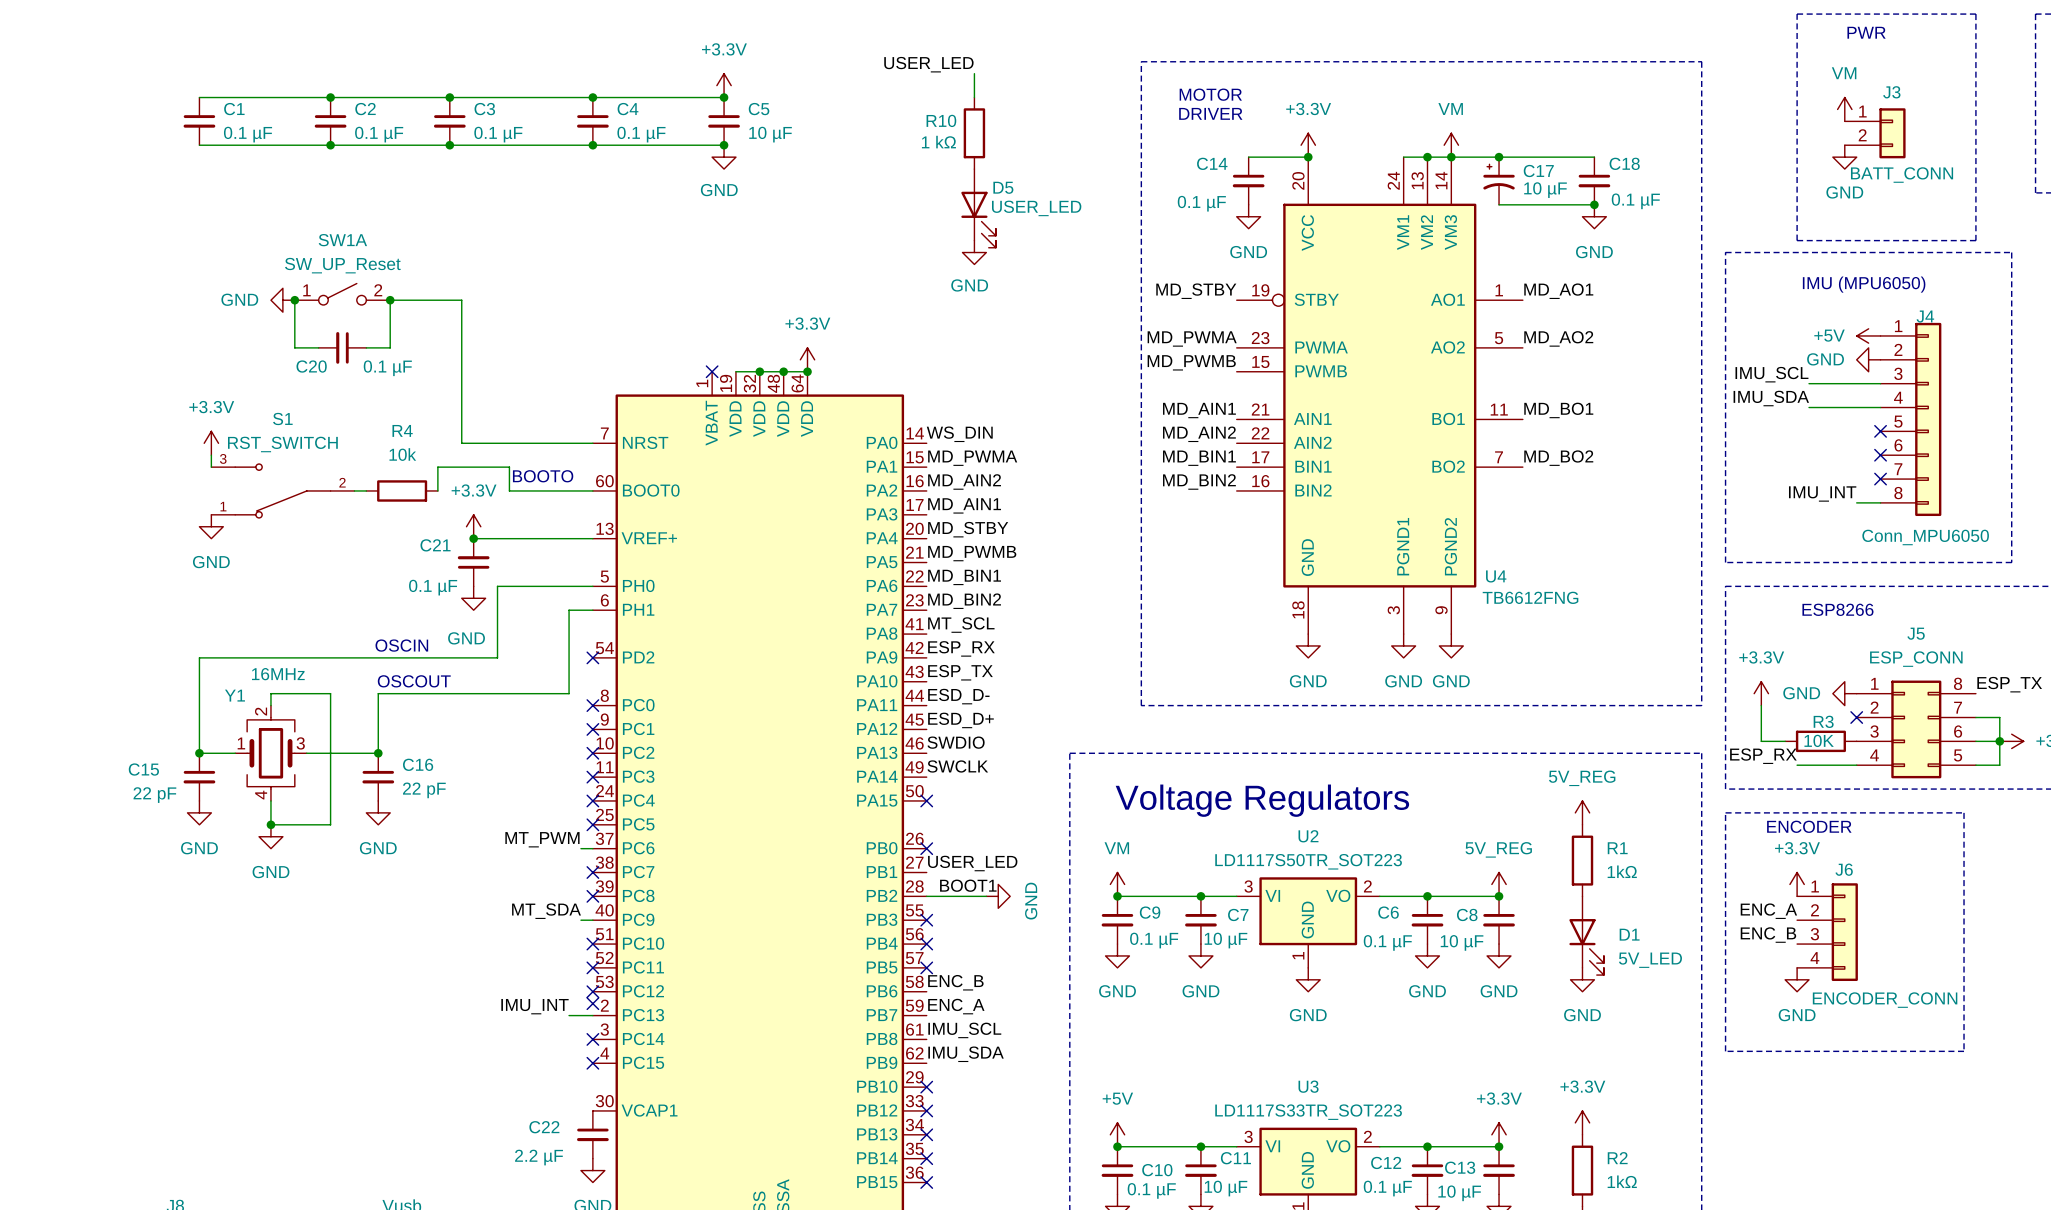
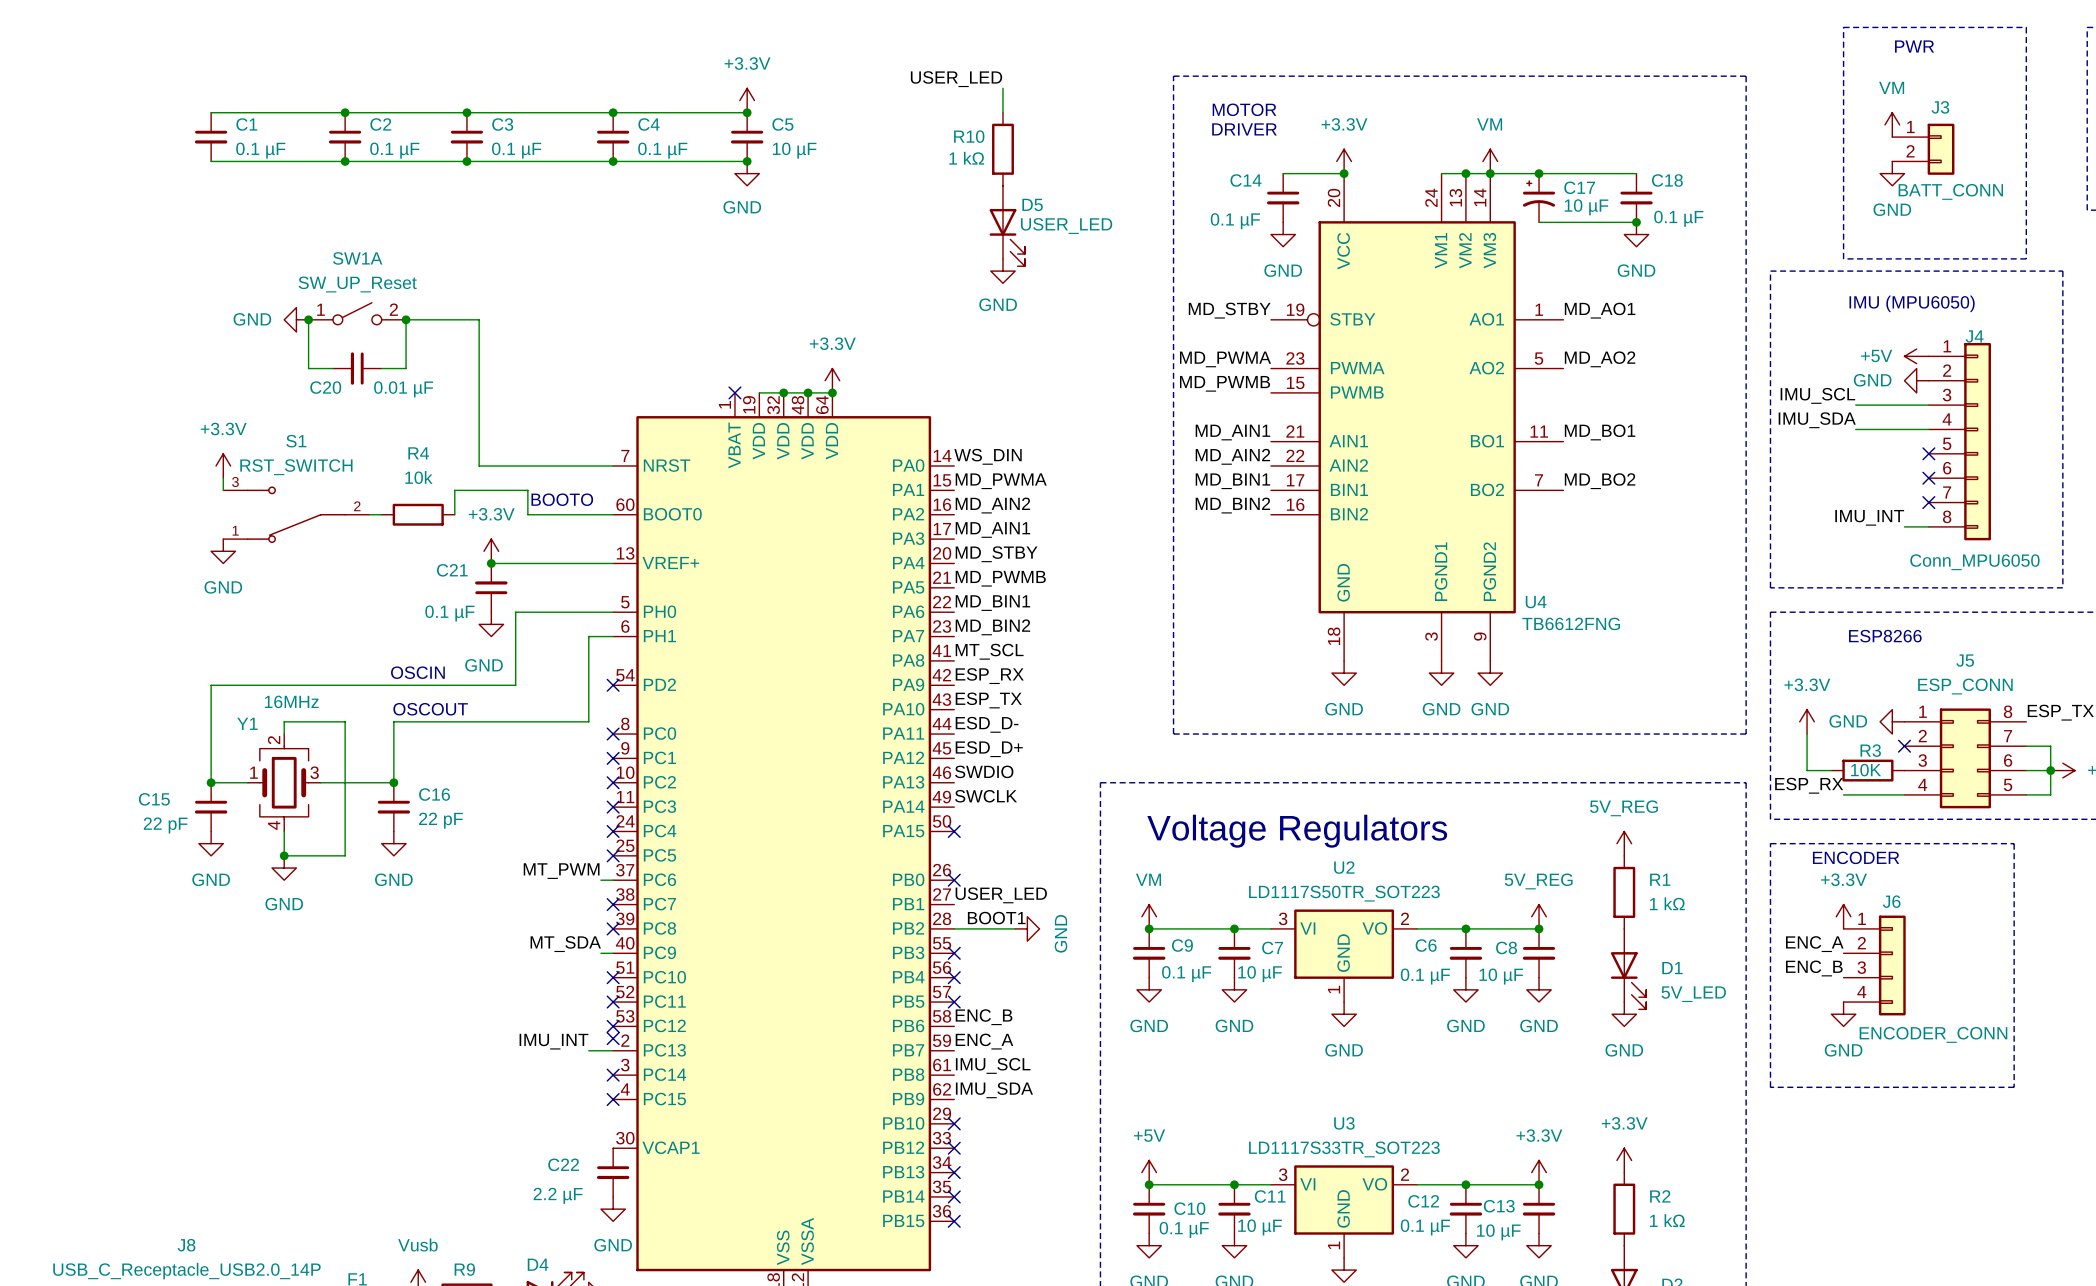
C20 value: 0.1 µF (387, 368) -> 0.01 µF (403, 389)
R1 value: 1kΩ (1622, 871) -> 1 kΩ (1667, 903)
R2 value: 1kΩ (1622, 1181) -> 1 kΩ (1667, 1220)

